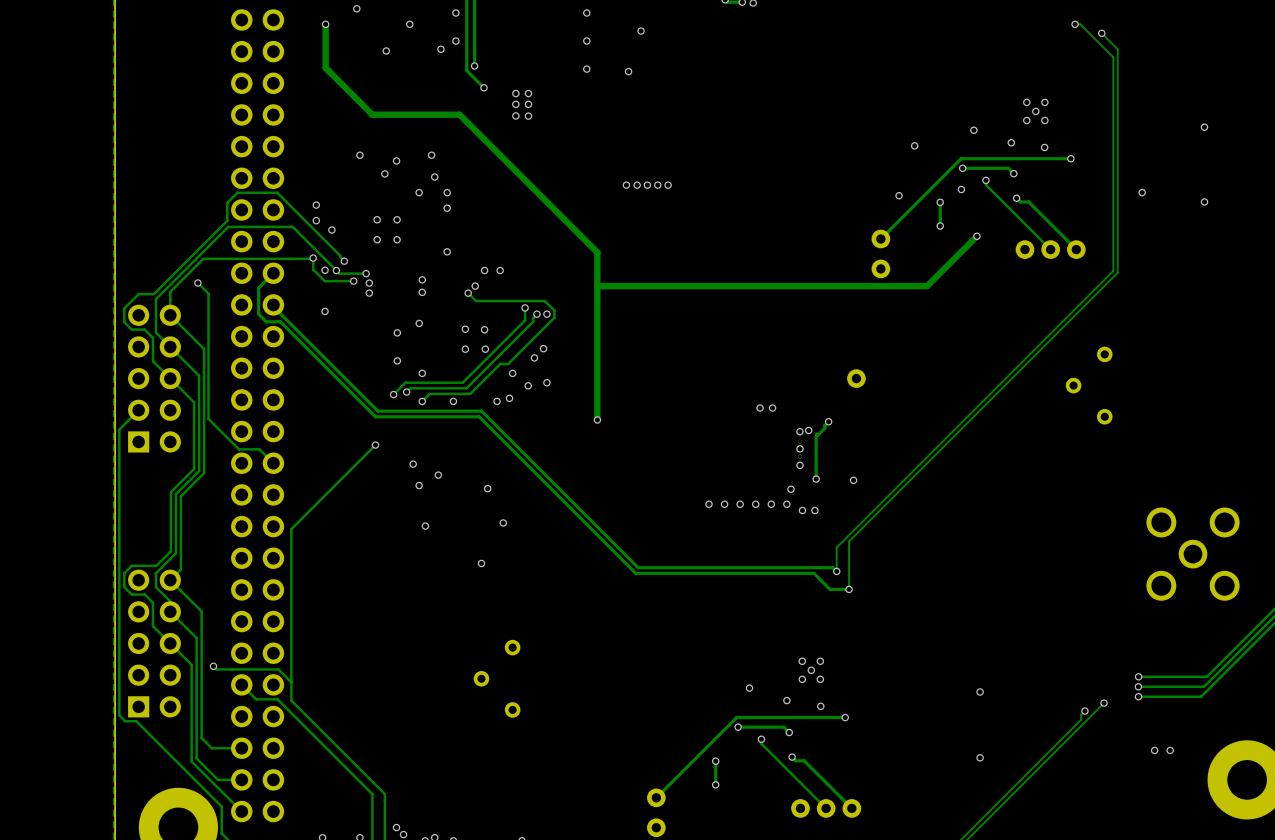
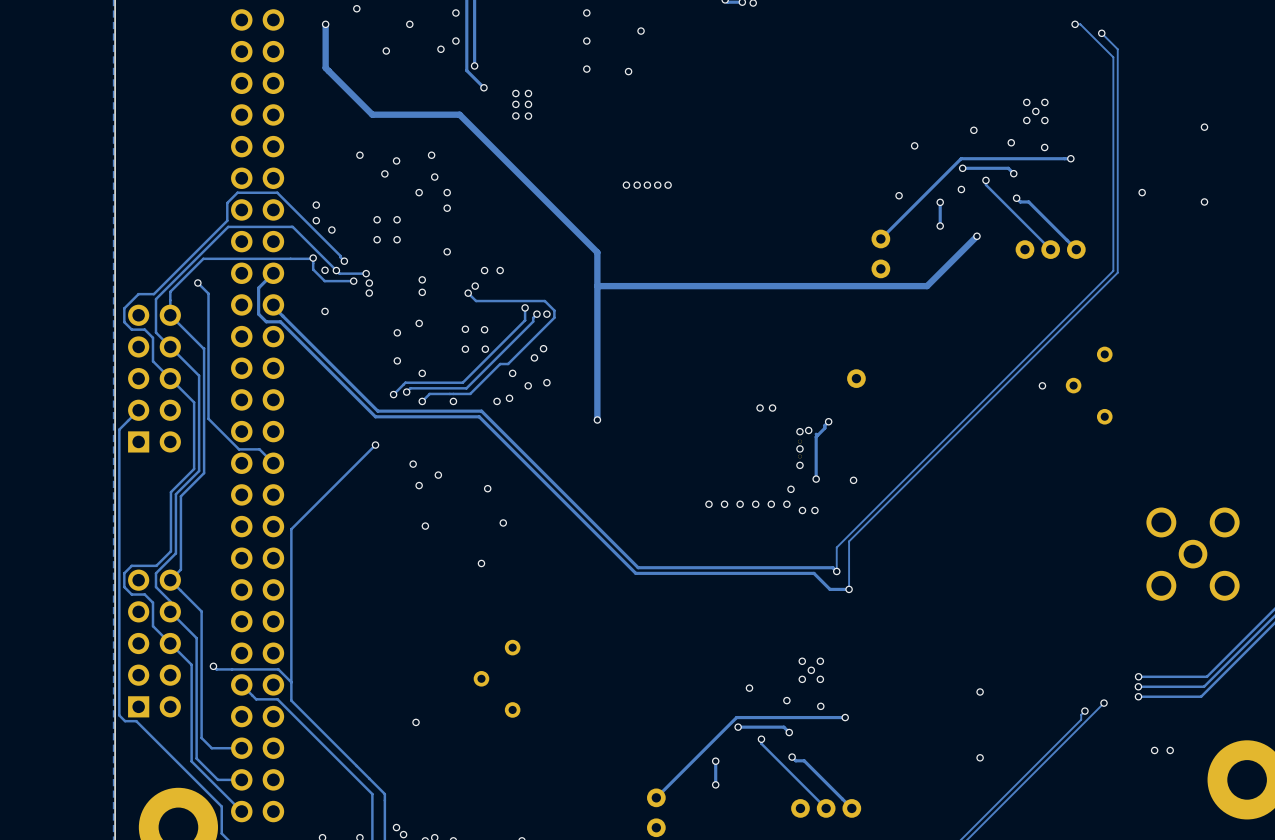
via: none -> (1042, 385)
via: none -> (416, 722)

